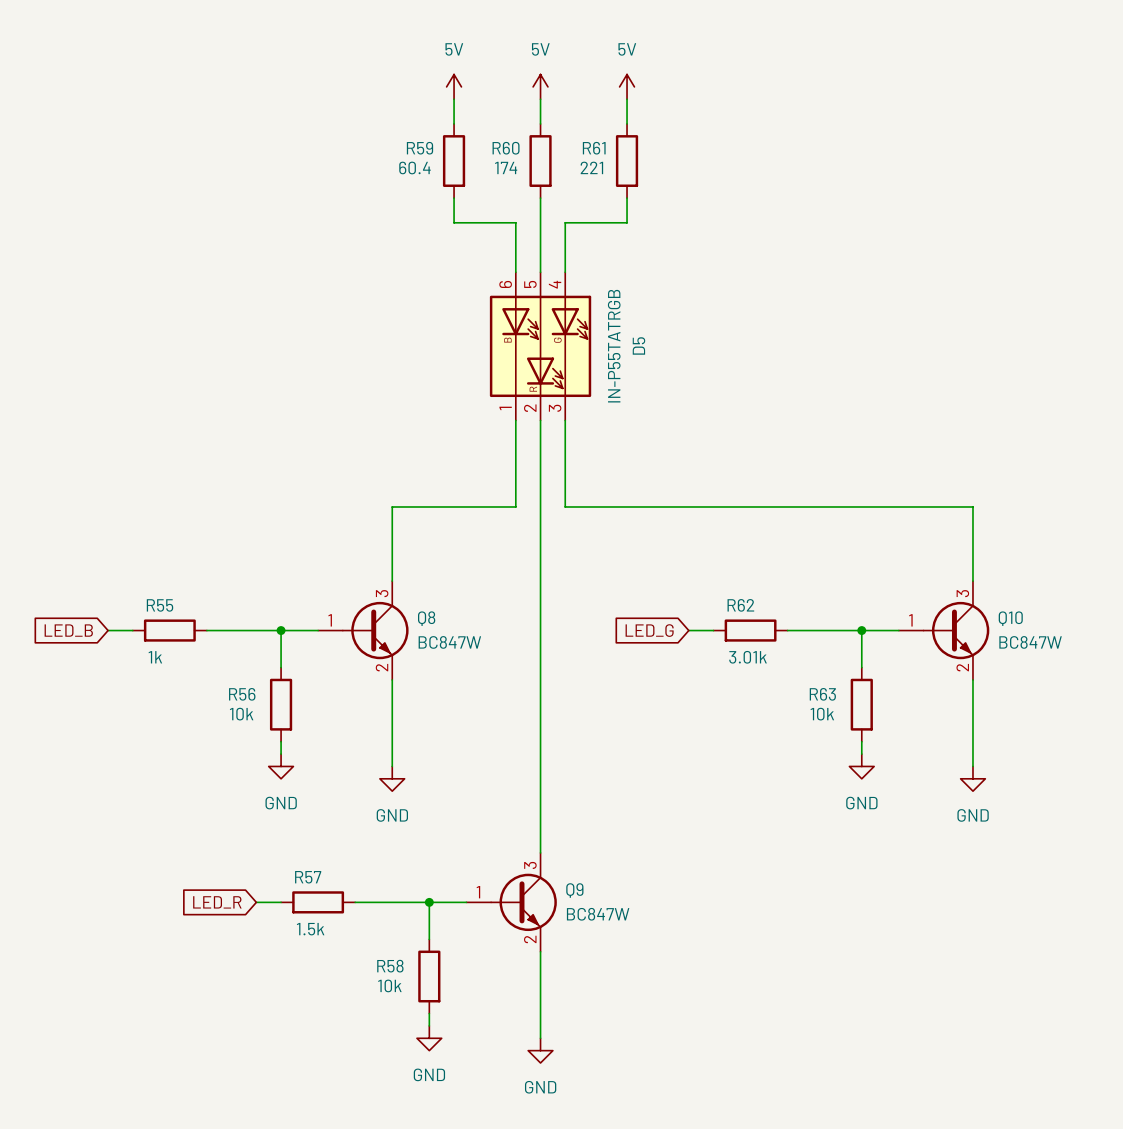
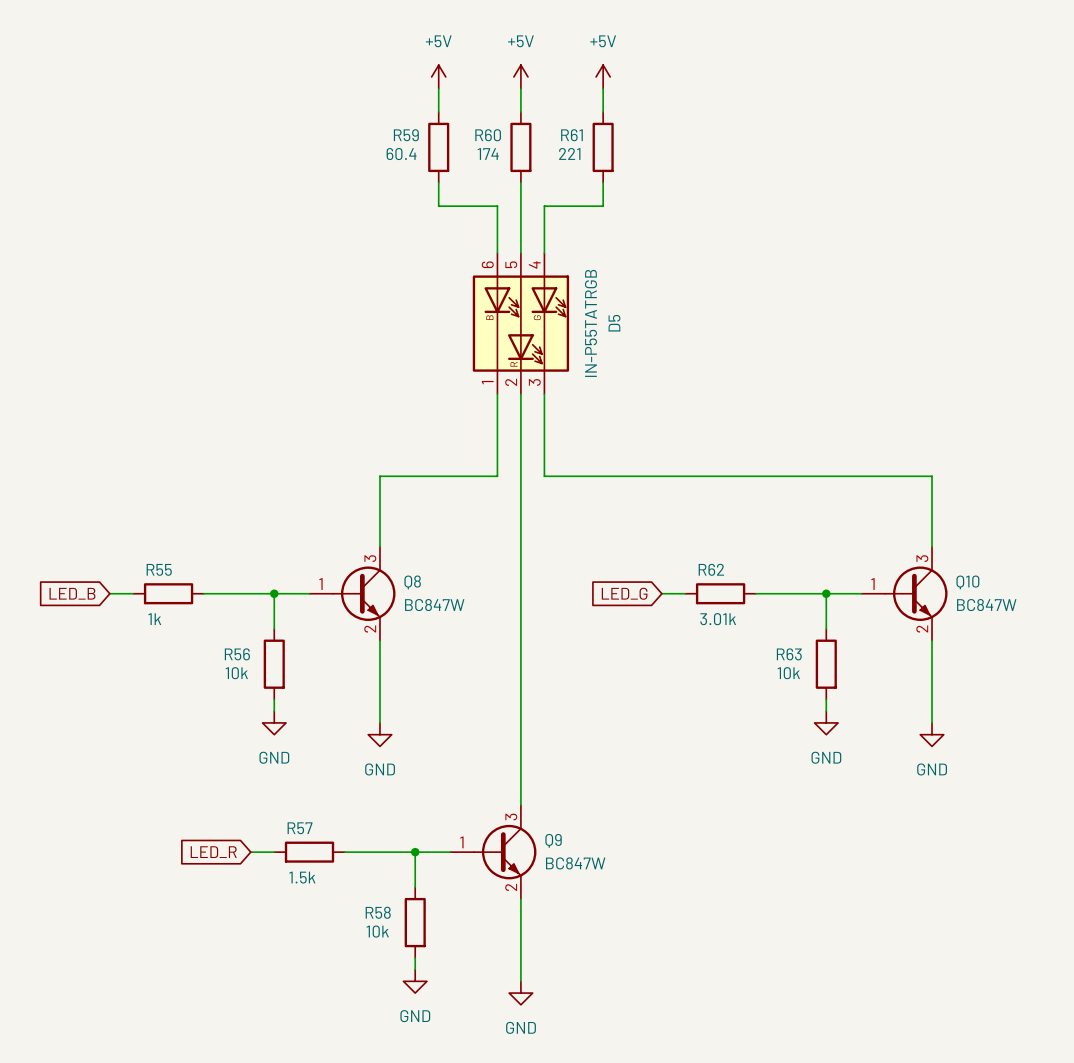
power symbol: 5V (454, 86) -> +5V (438, 76)
power symbol: 5V (540, 86) -> +5V (520, 76)
power symbol: 5V (627, 86) -> +5V (603, 76)

